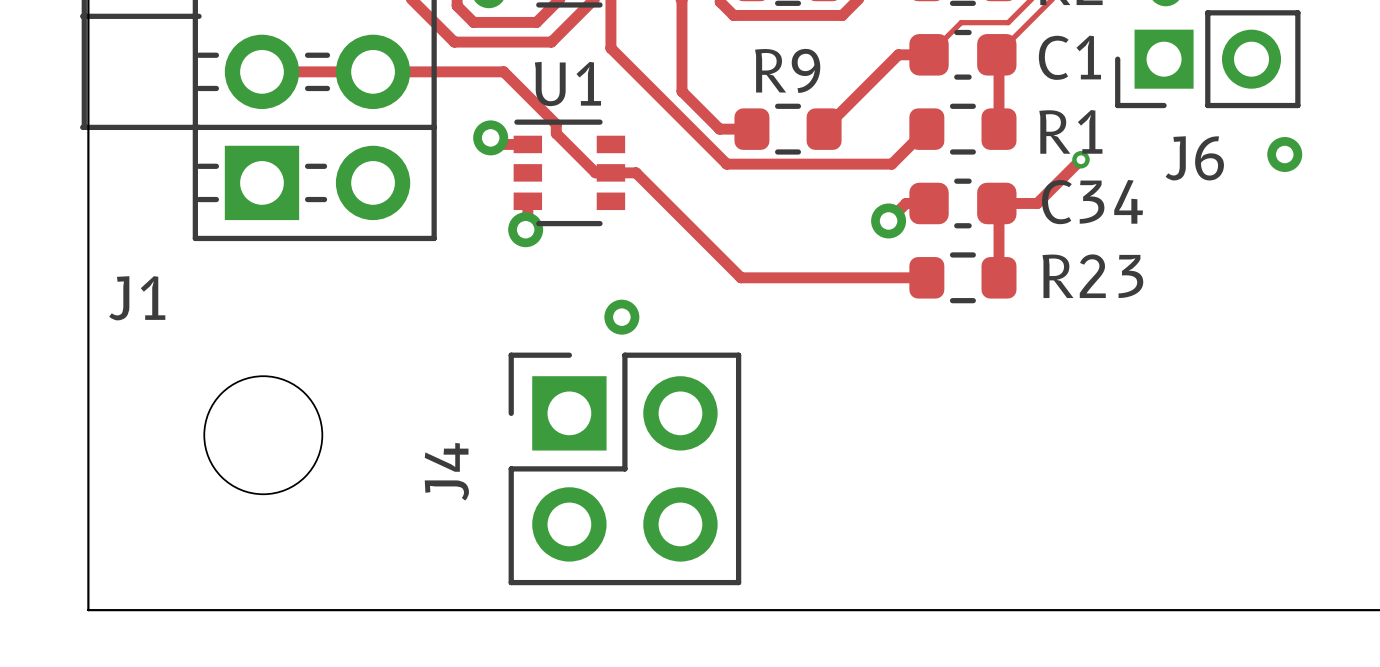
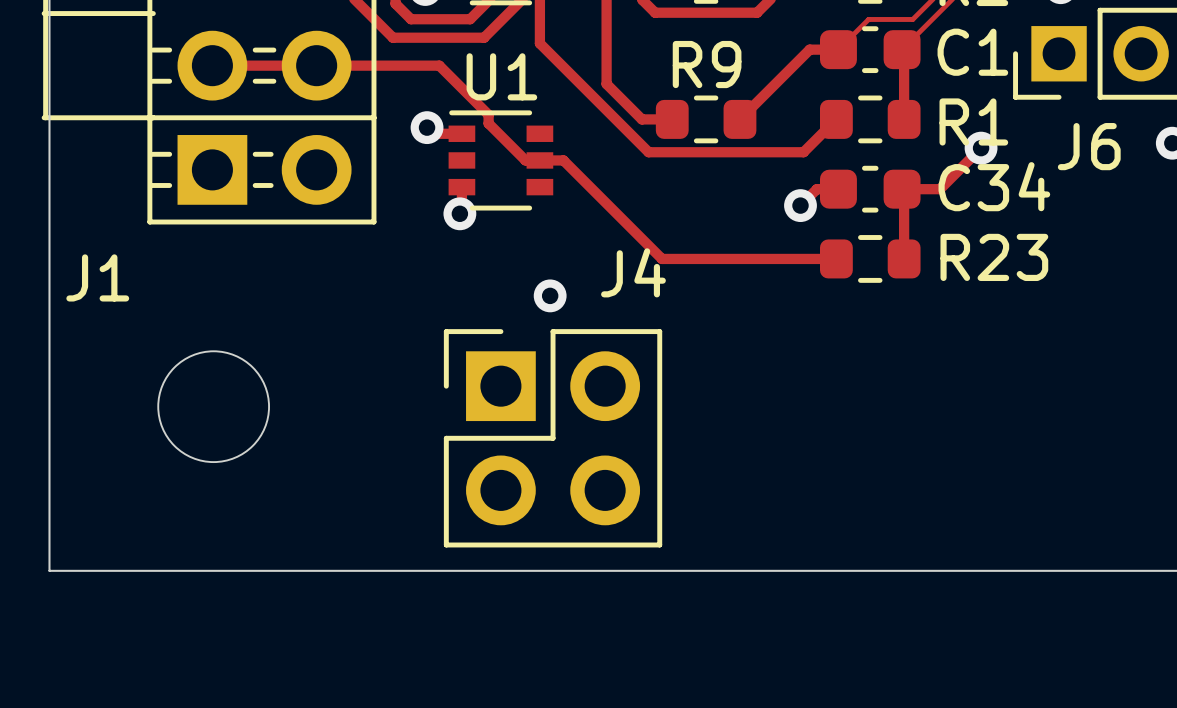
via size: [1072, 151, 1090, 169] -> [964, 131, 998, 165]
J4 name rotation: 0° (446, 471) -> 90° clockwise (633, 272)
J4 name position: J4 (446, 471) -> J4 (633, 272)

